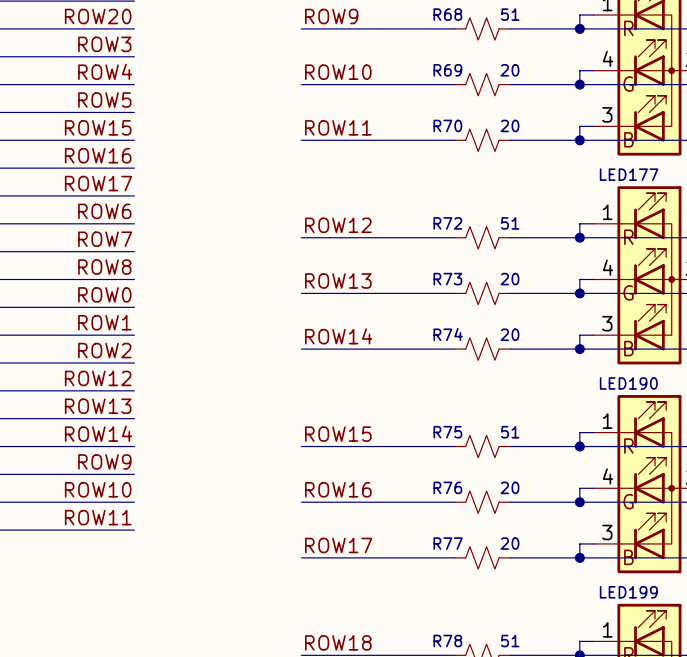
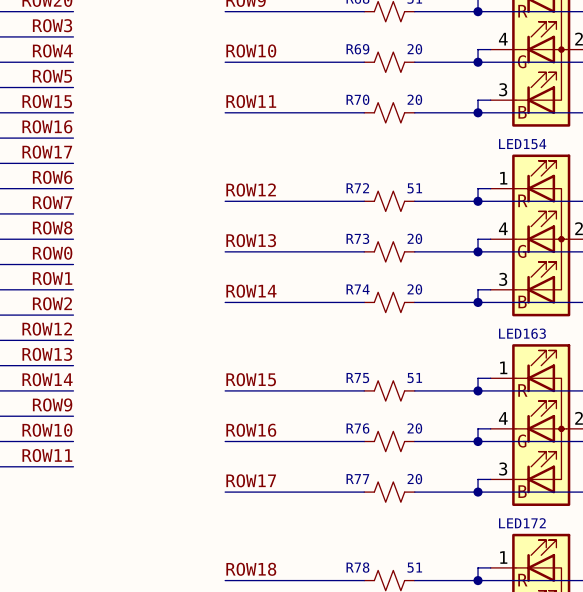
LED177 name: LED177 (629, 174) -> LED154 (522, 144)
LED190 name: LED190 (628, 383) -> LED163 (522, 333)
LED199 name: LED199 (628, 592) -> LED172 (522, 523)

